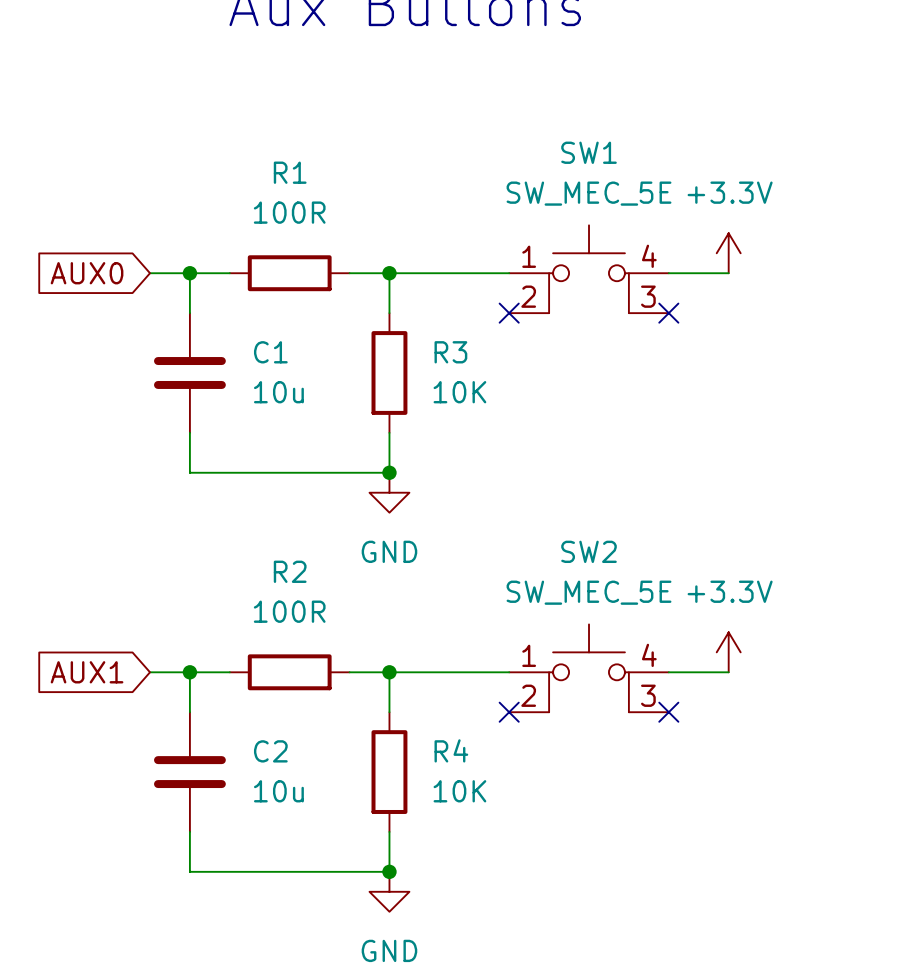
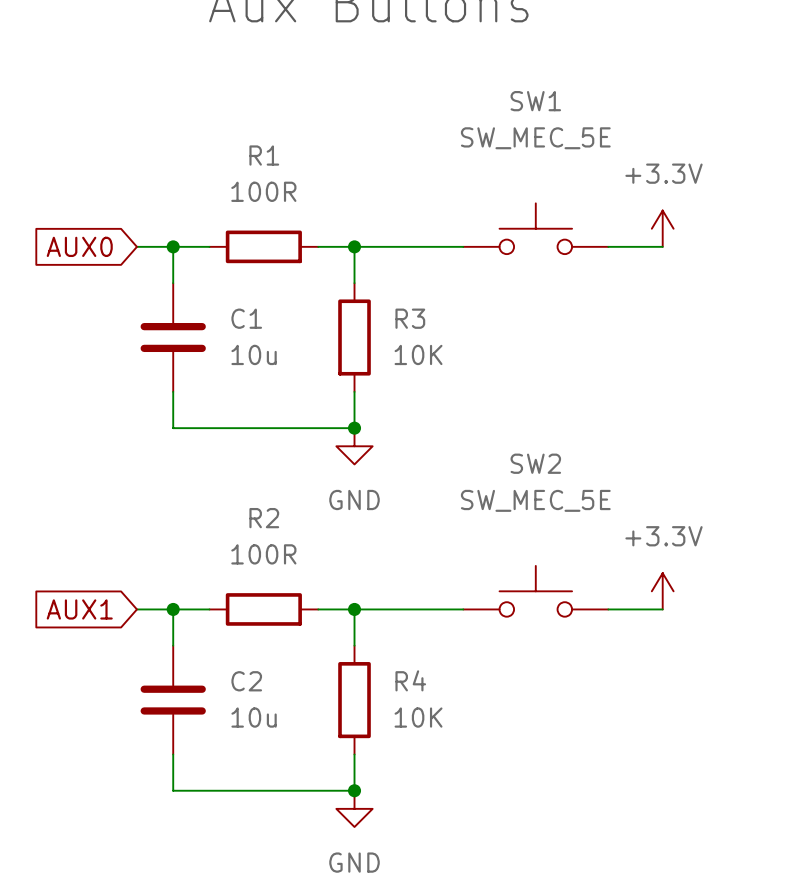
SW1 symbol: [509, 225, 669, 314] -> [463, 203, 609, 255]
no-connect mark: (509, 313) -> none
no-connect mark: (668, 313) -> none
SW2 symbol: [509, 624, 669, 713] -> [463, 565, 609, 617]
no-connect mark: (509, 712) -> none
no-connect mark: (668, 712) -> none

